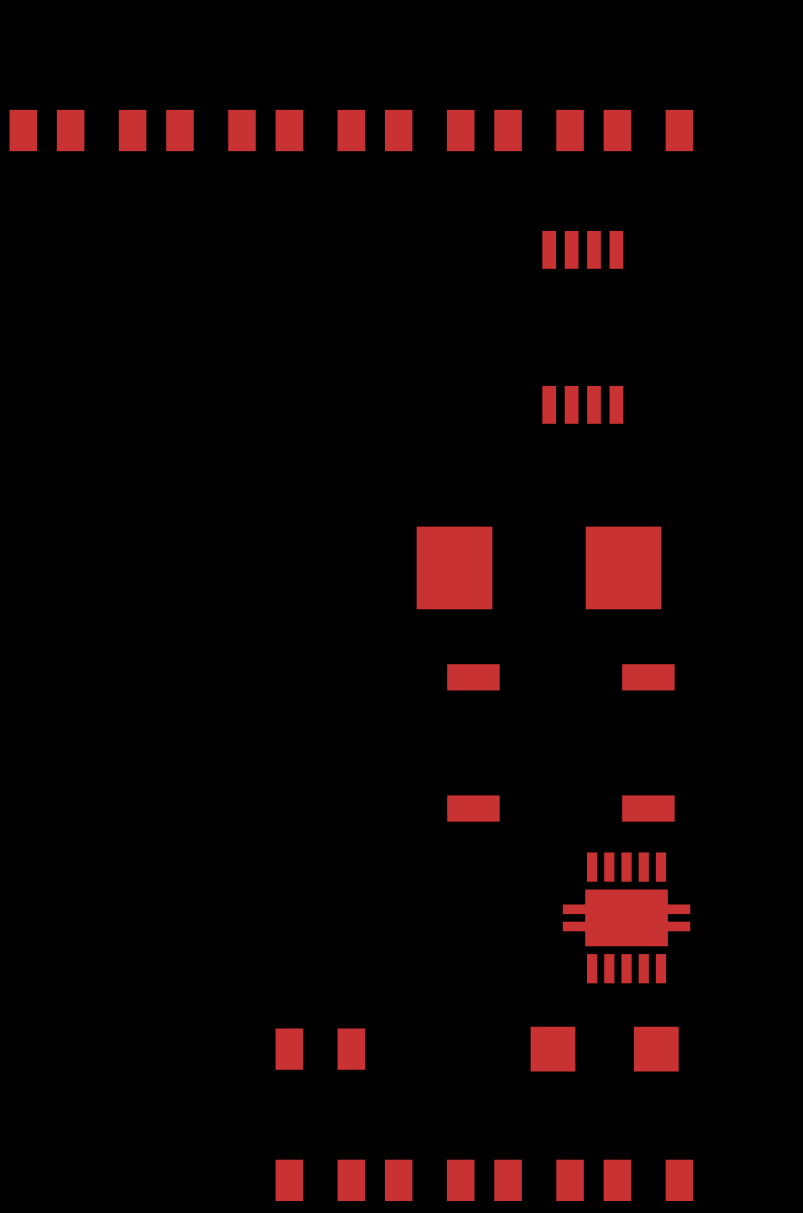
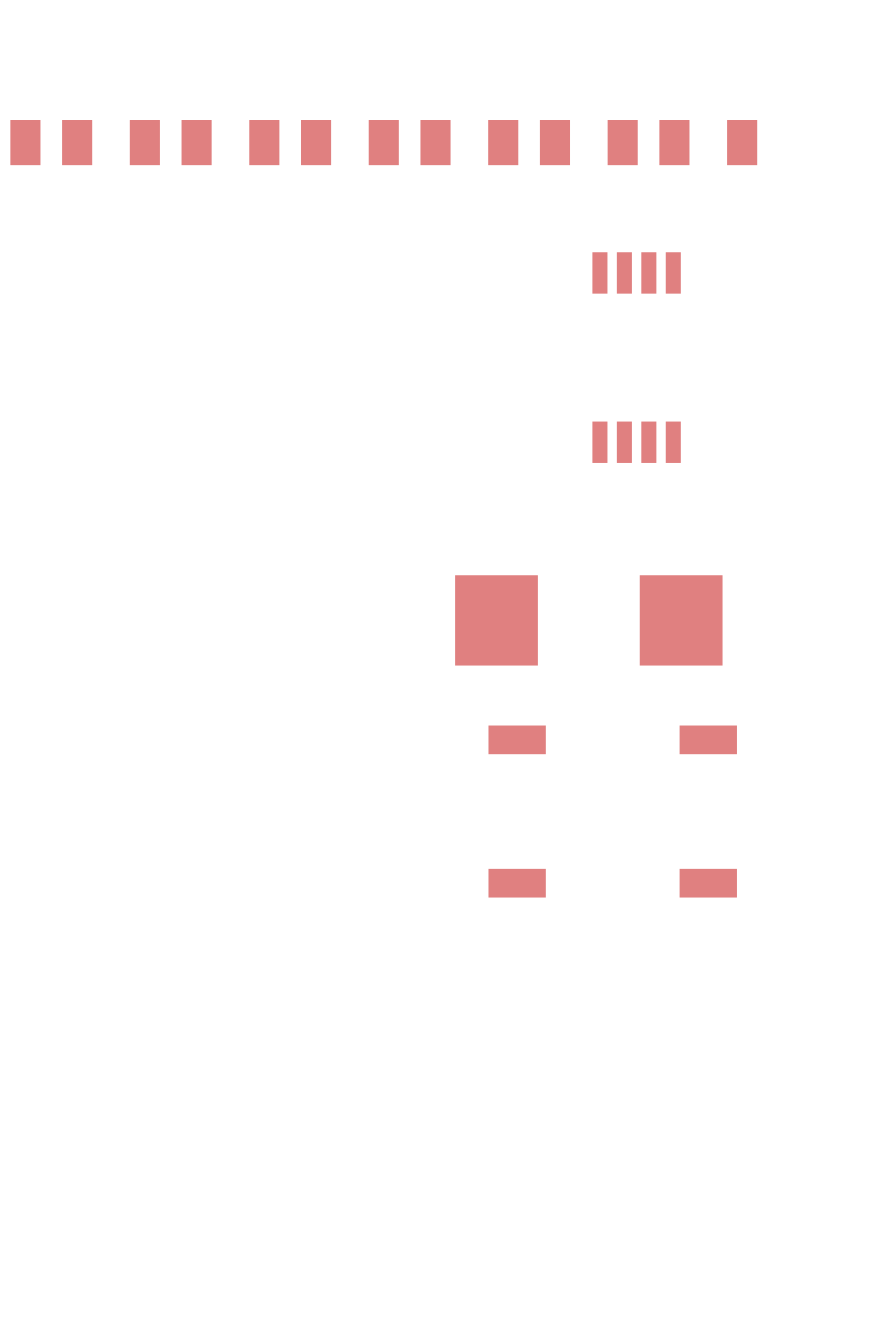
part: (626, 917) -> none
part: (320, 1049) -> none
part: (604, 1049) -> none
part: (320, 1180) -> none
part: (429, 1180) -> none
part: (539, 1180) -> none
part: (648, 1180) -> none

